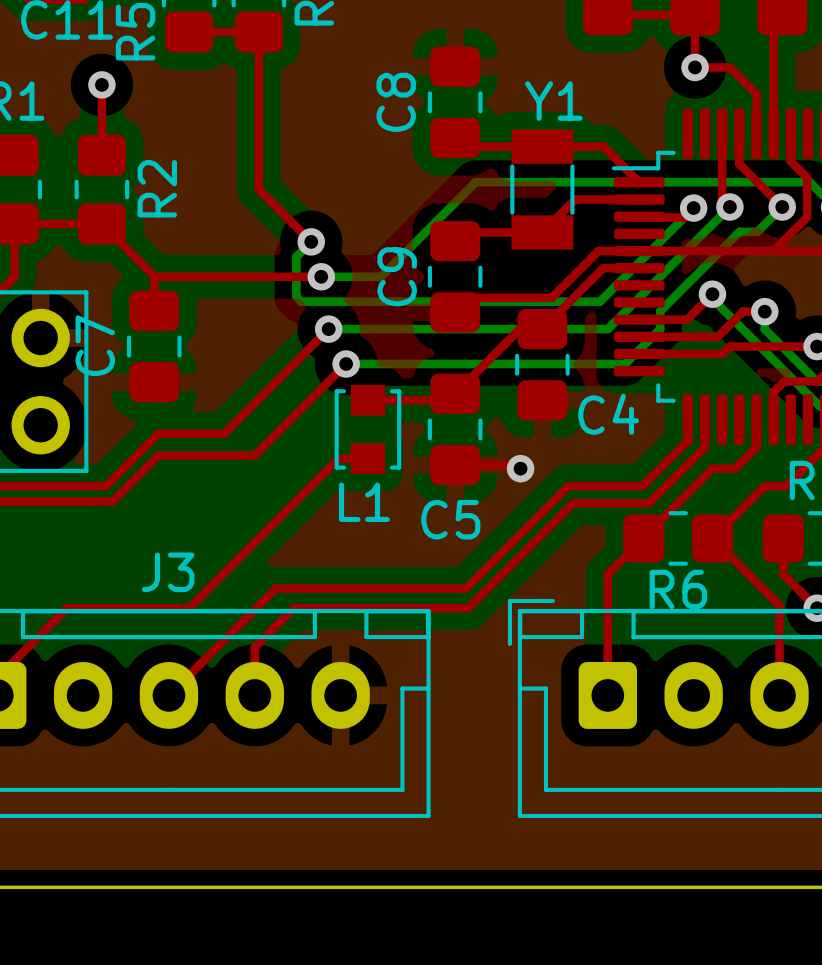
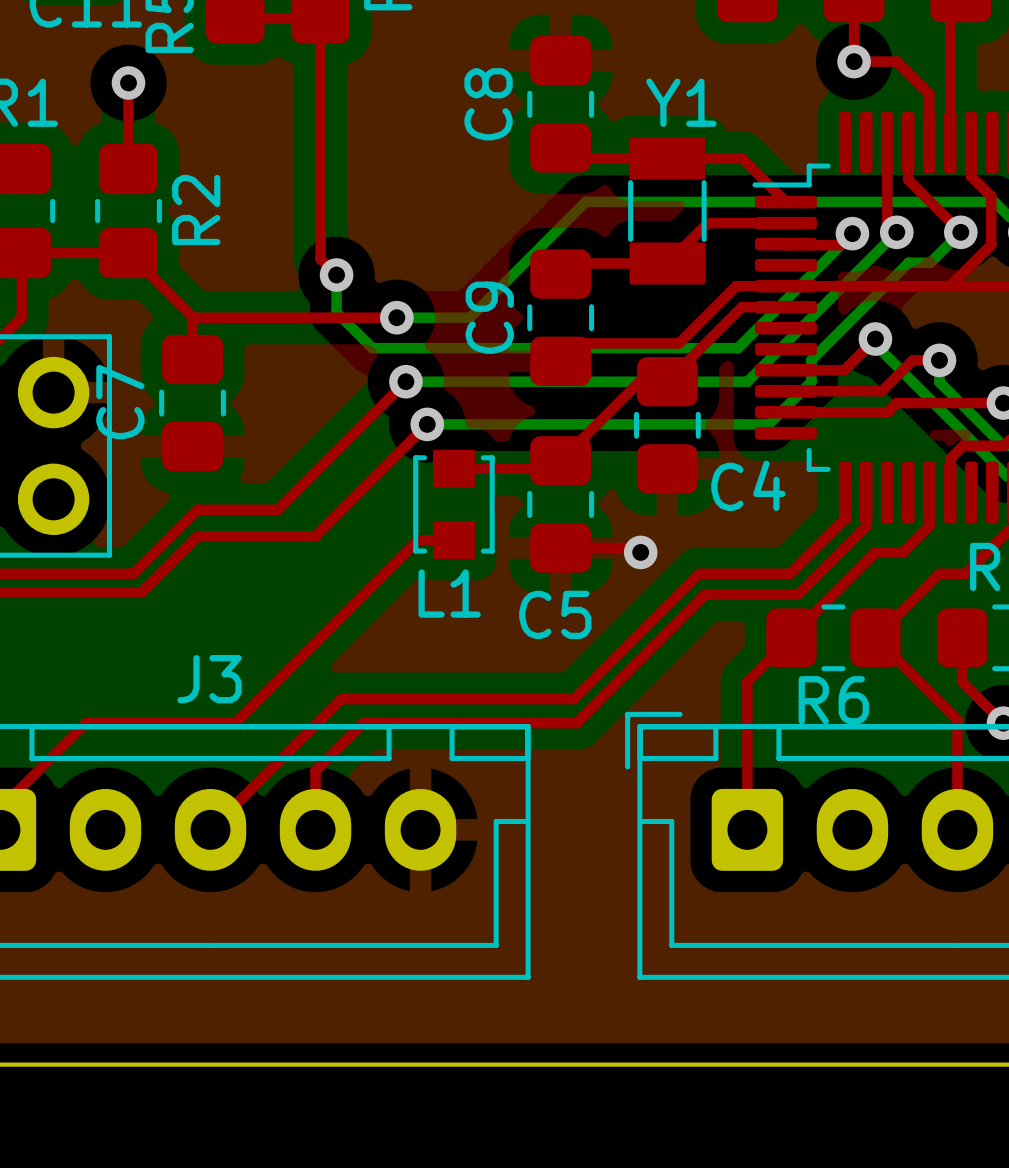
top track: (258, 189) (311, 241) -> (320, 210) (320, 259) (336, 275)
bottom track: (311, 241) (296, 256) (296, 296) -> (336, 275) (336, 312) (366, 342)
via position: (311, 241) -> (336, 275)

